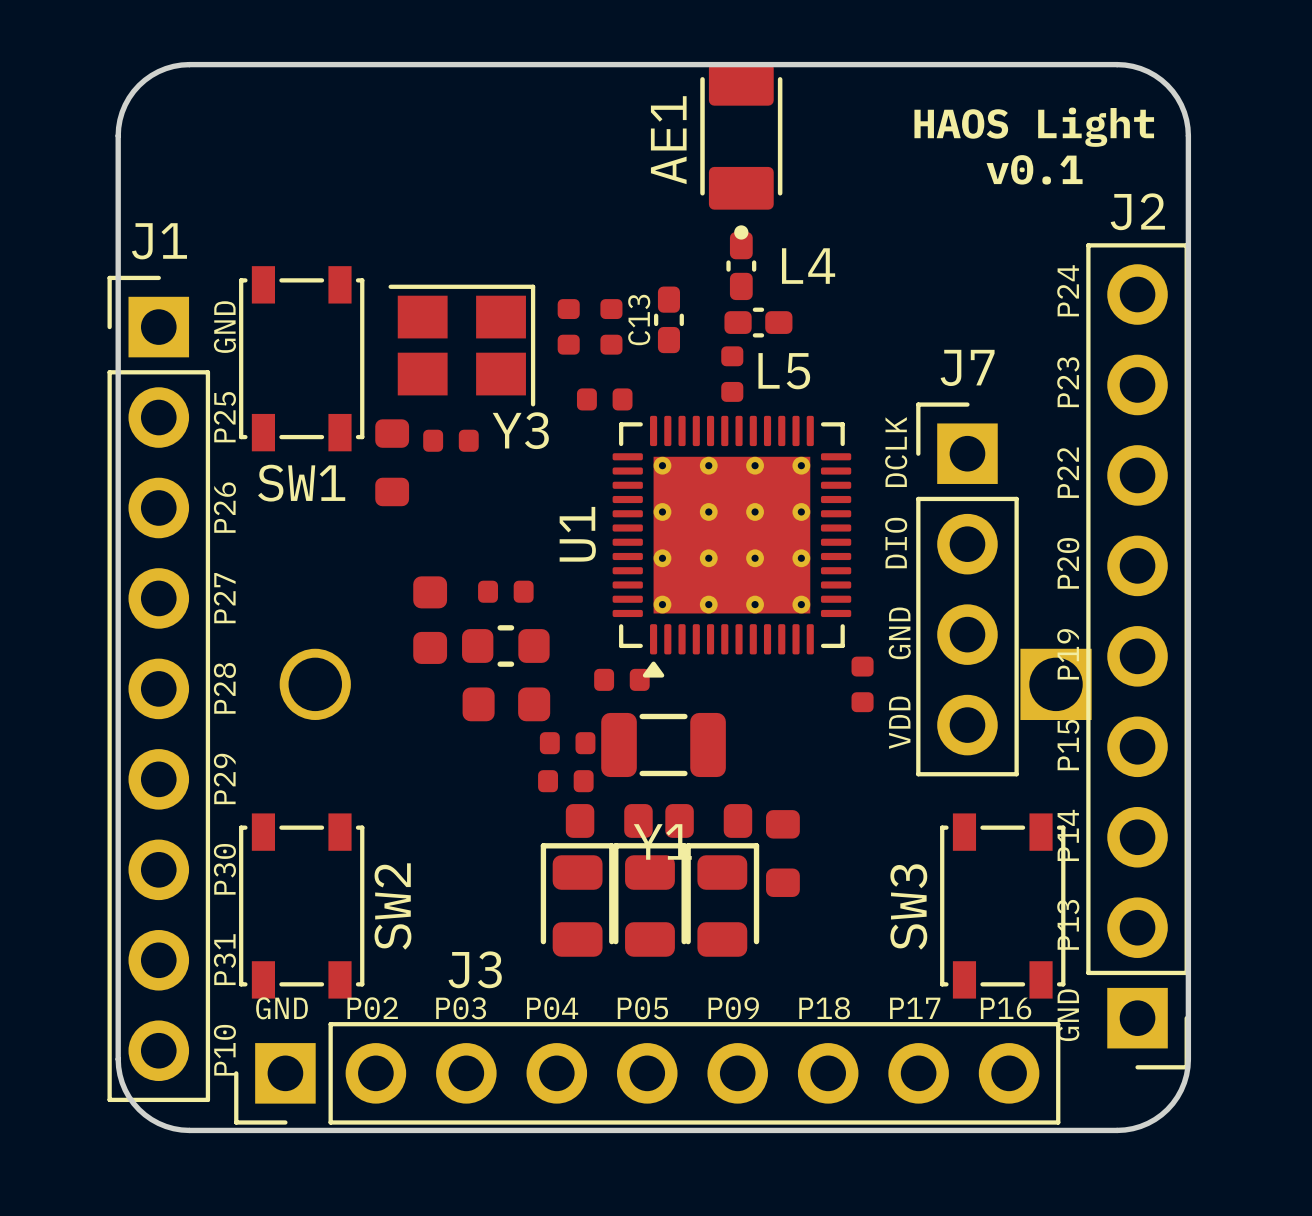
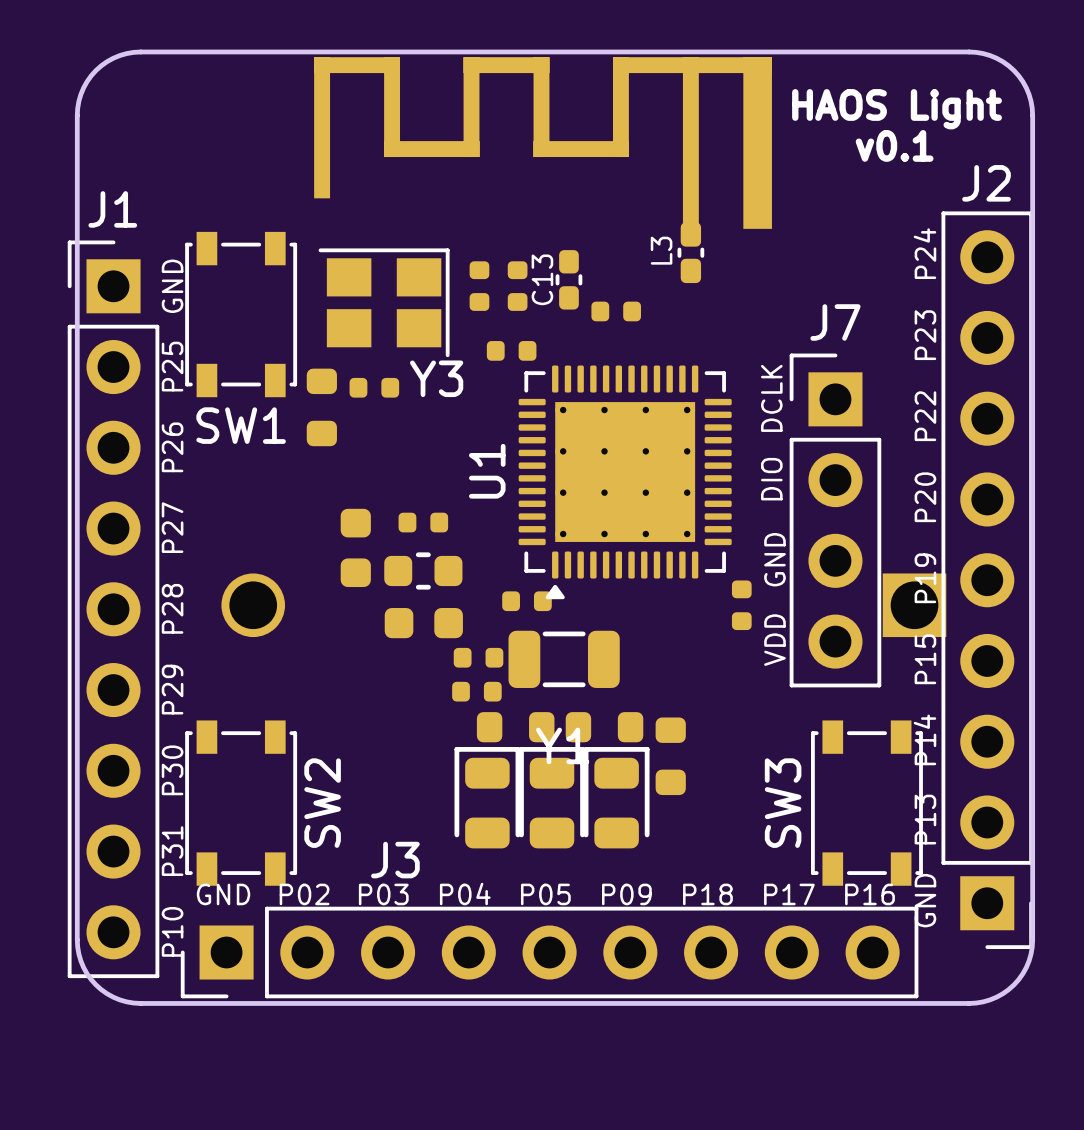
AE1: (741, 151) -> none
part: none -> (543, 143)
L4: (741, 266) -> none
L3: none -> (690, 252)
L5: (758, 322) -> none
part rotation: 0° (732, 374) -> 90° clockwise (616, 311)

